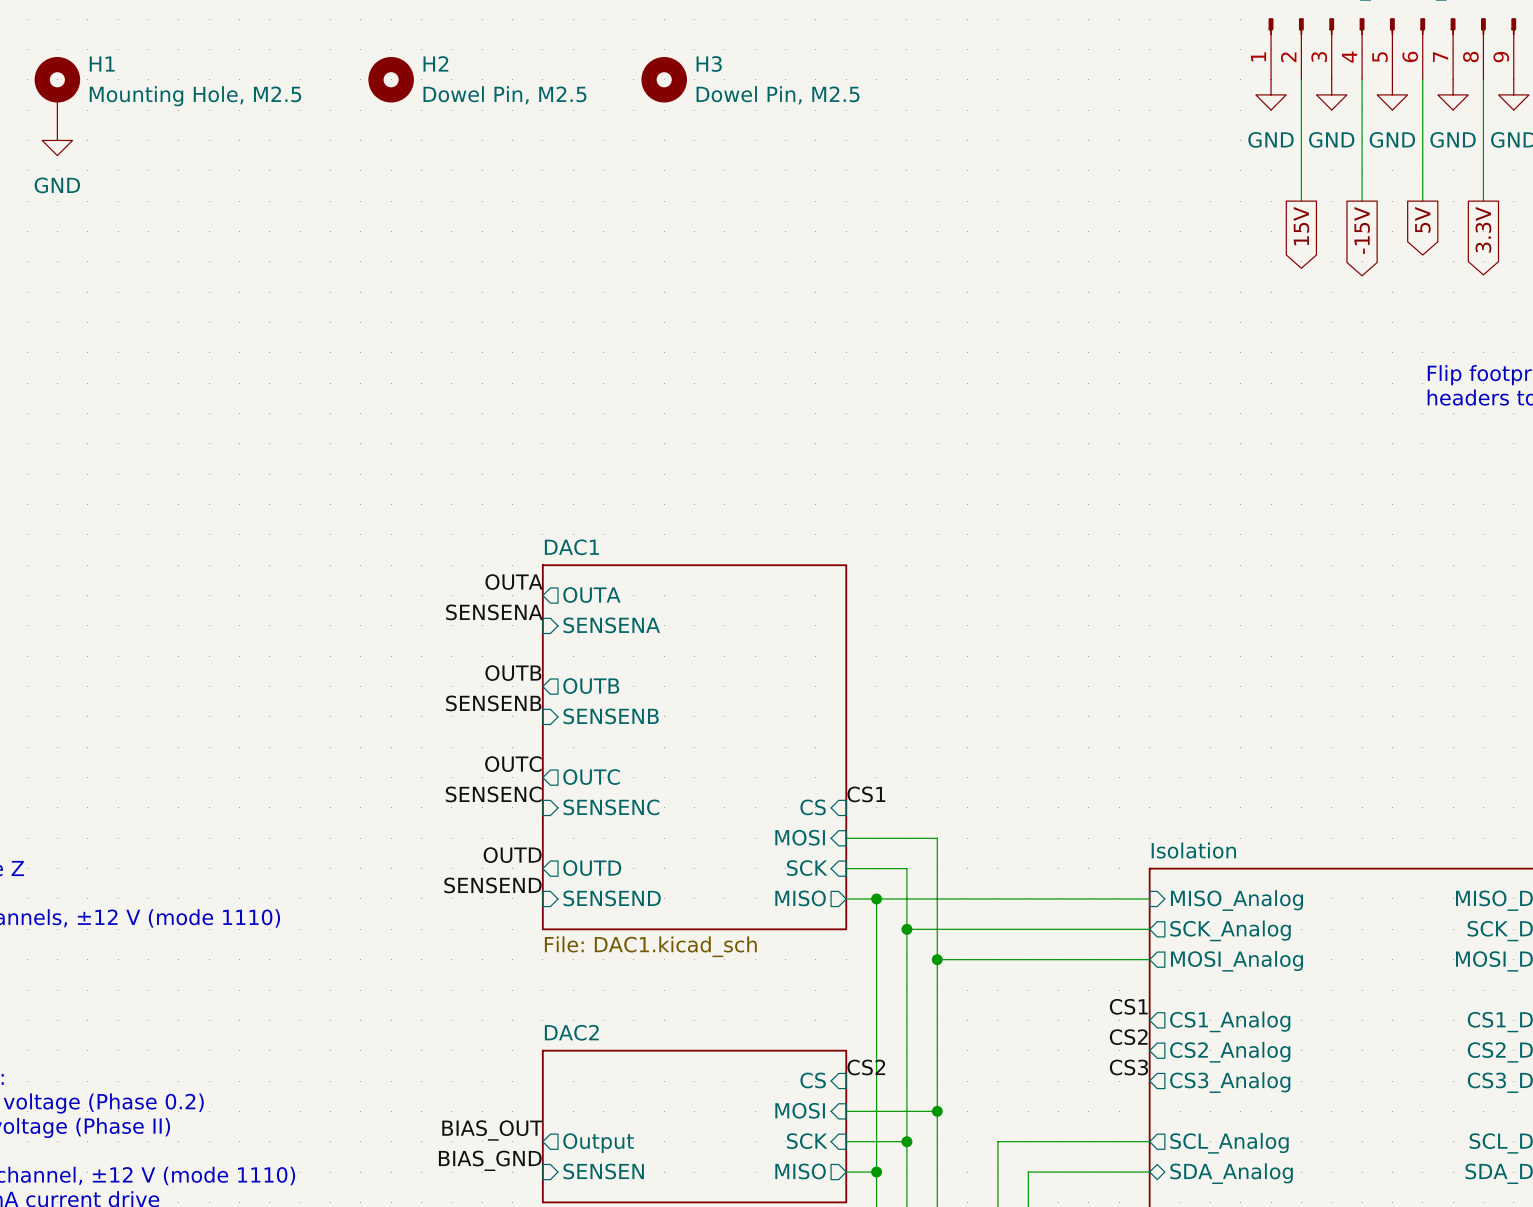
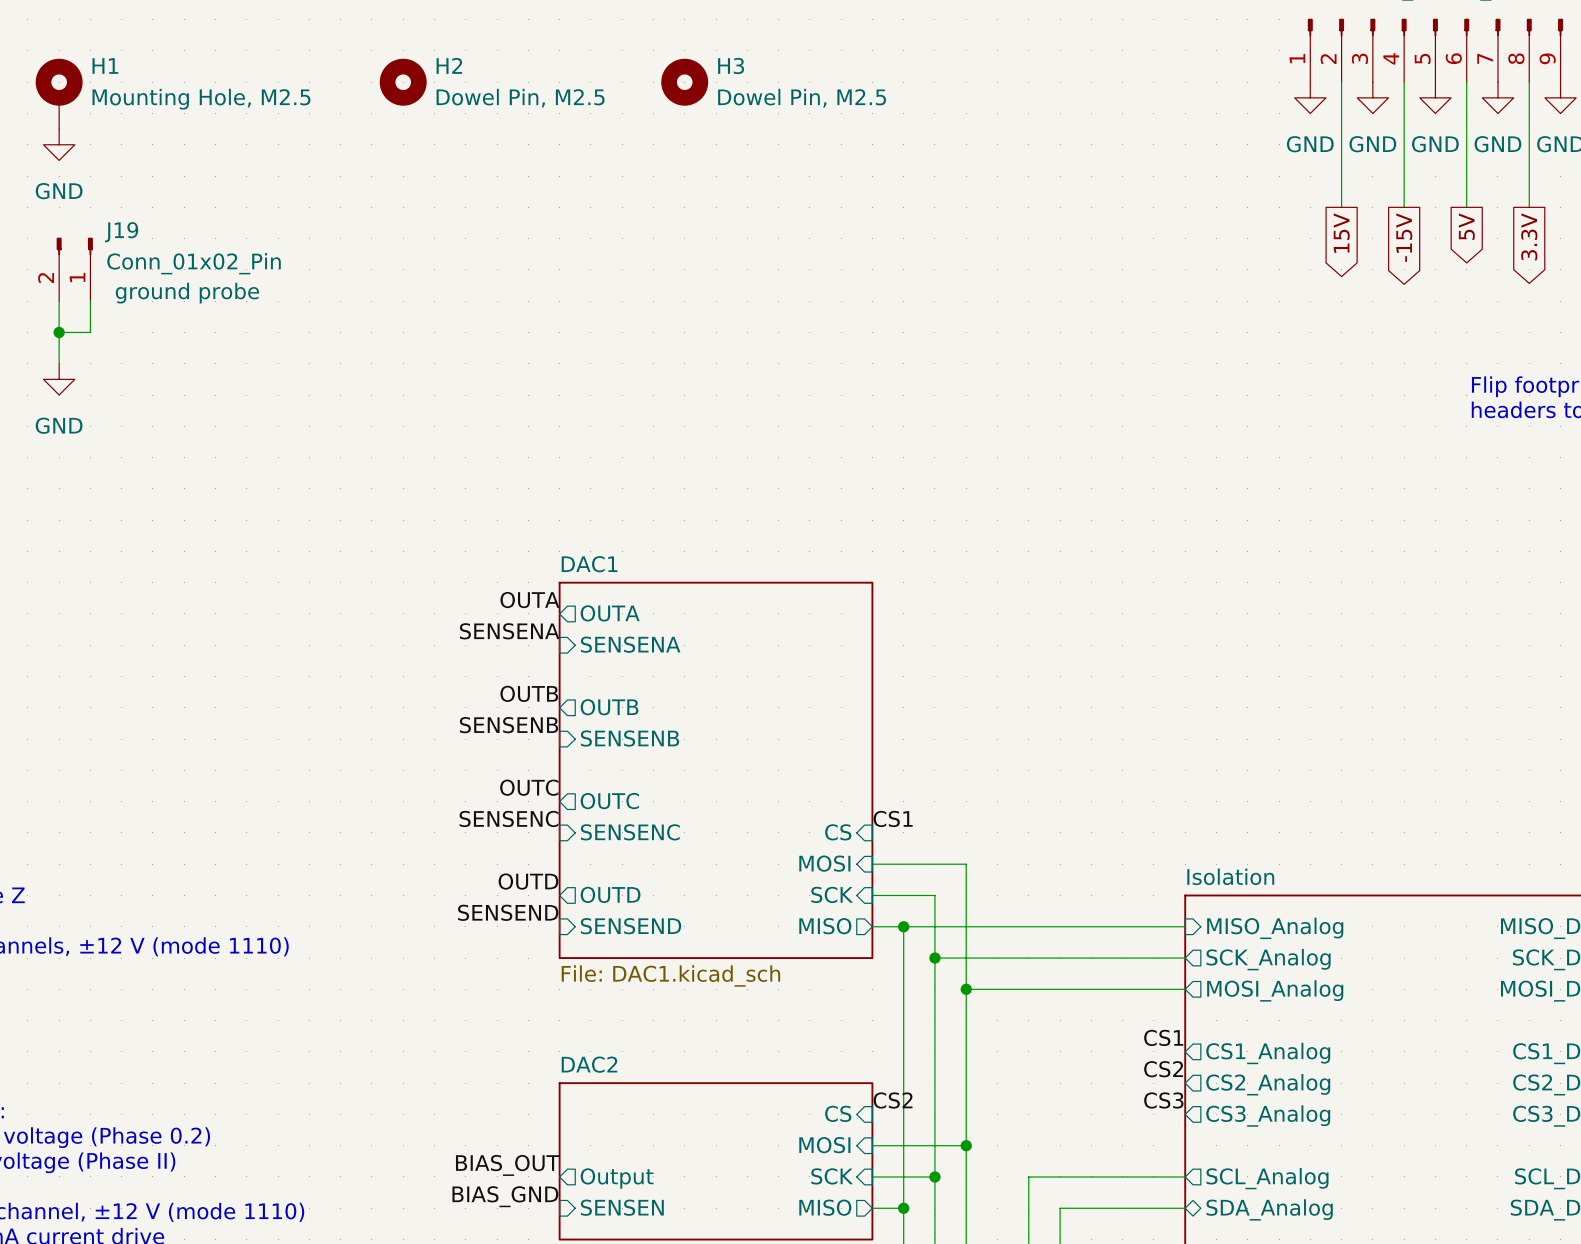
J19: none -> Conn_01x02_Pin (74, 269)
wire: none -> (59, 301) (59, 363)
wire: none -> (90, 301) (90, 332) (59, 332)
junction: none -> (59, 332)
power symbol: none -> GND (59, 379)

